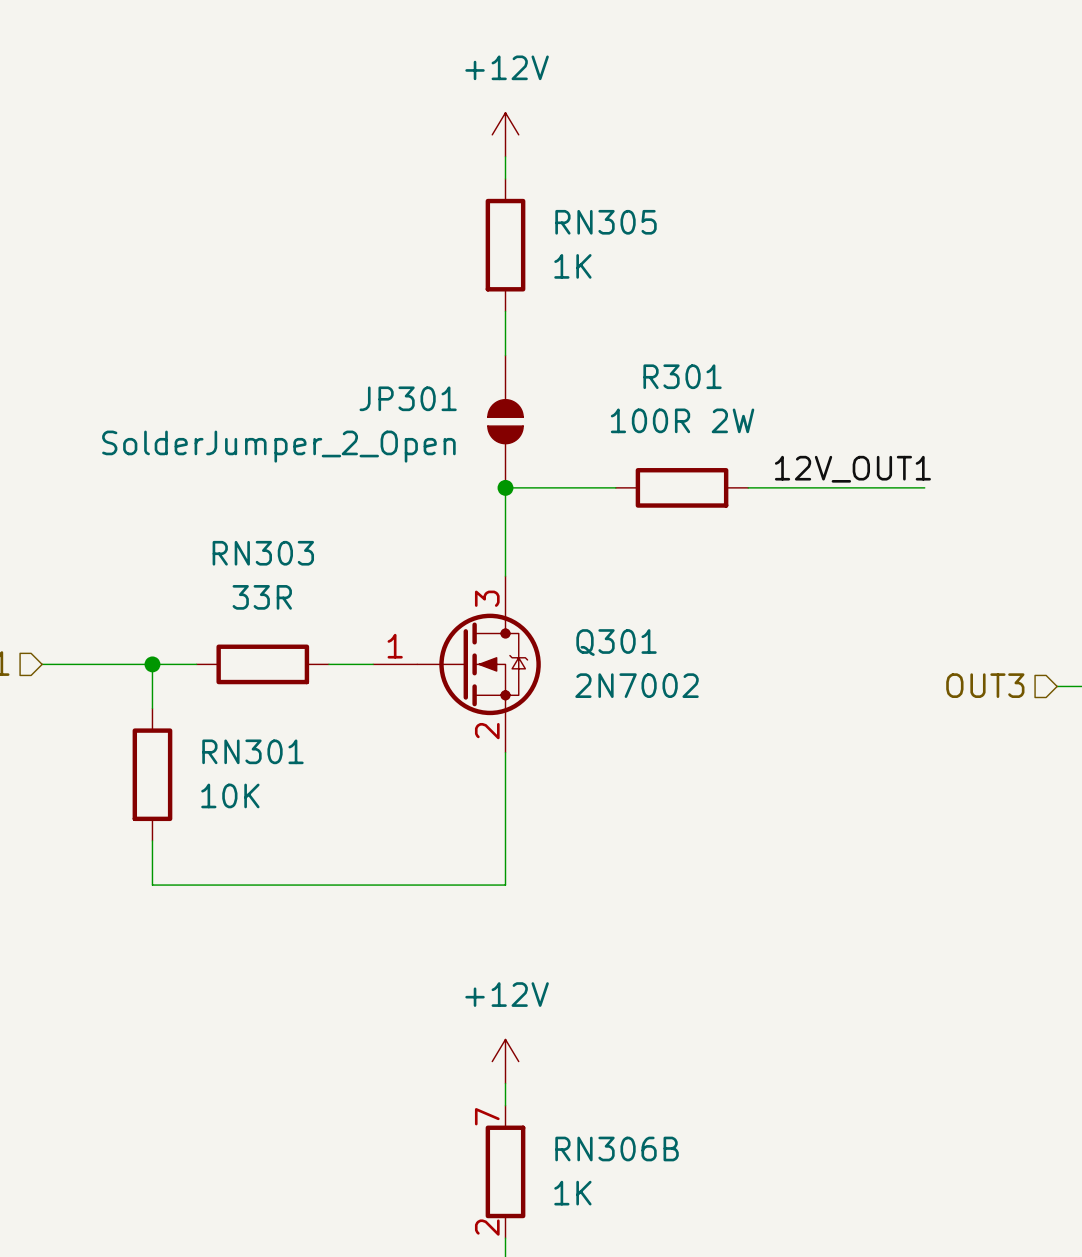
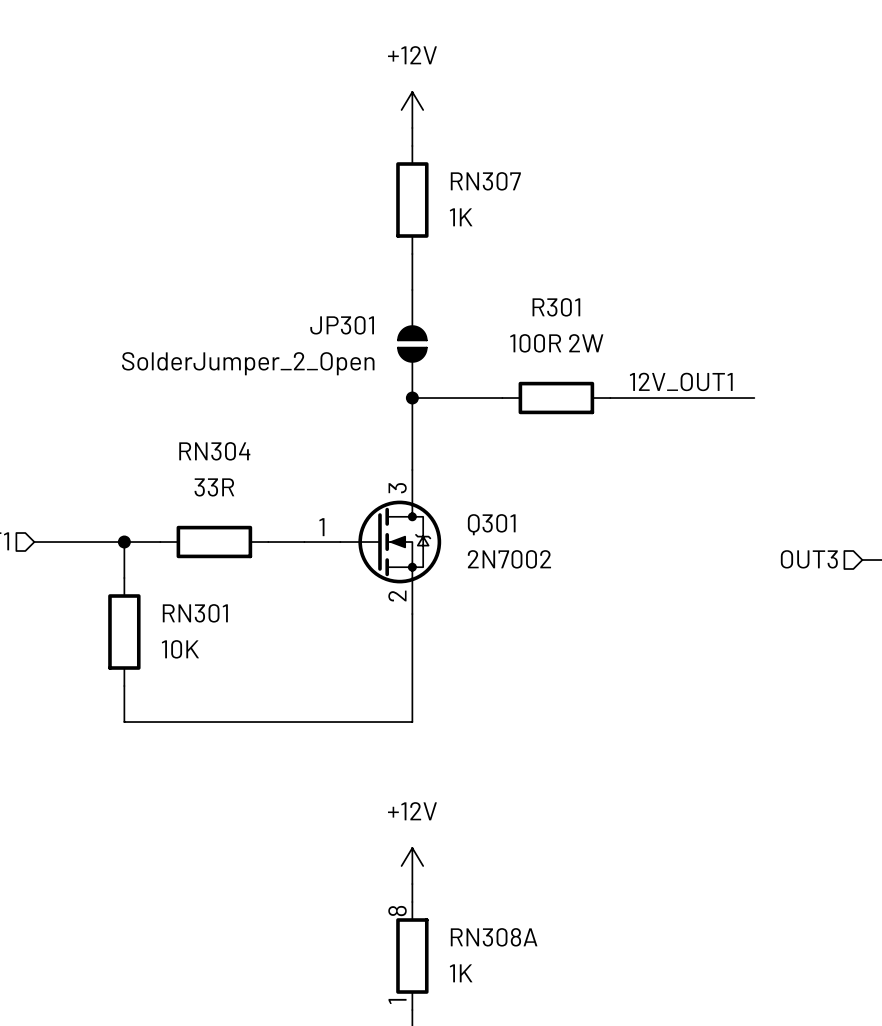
RN305 name: RN305 (606, 222) -> RN307 (485, 181)
RN303 name: RN303 (263, 553) -> RN304 (214, 451)
RN306B pin number: 7 (487, 1116) -> 8 (397, 911)
RN306B name: RN306B (617, 1149) -> RN308A (494, 937)
RN306B pin number: 2 (487, 1227) -> 1 (397, 1001)

